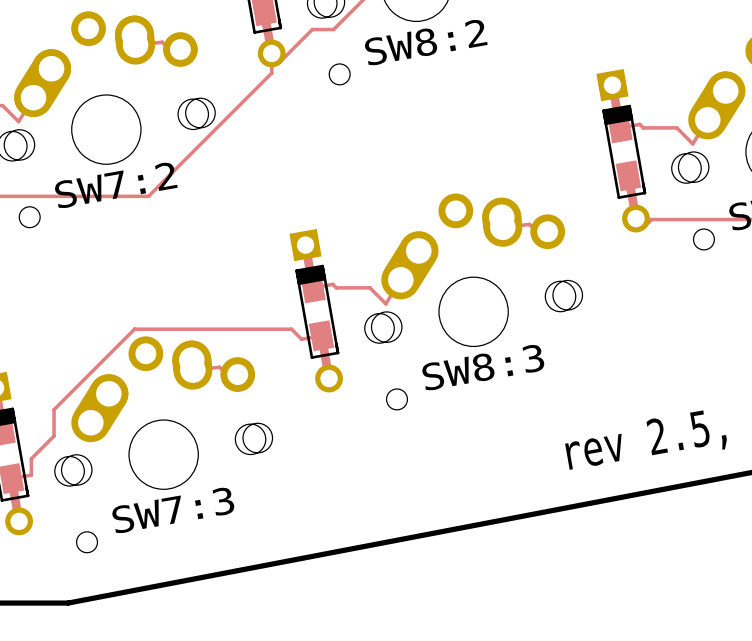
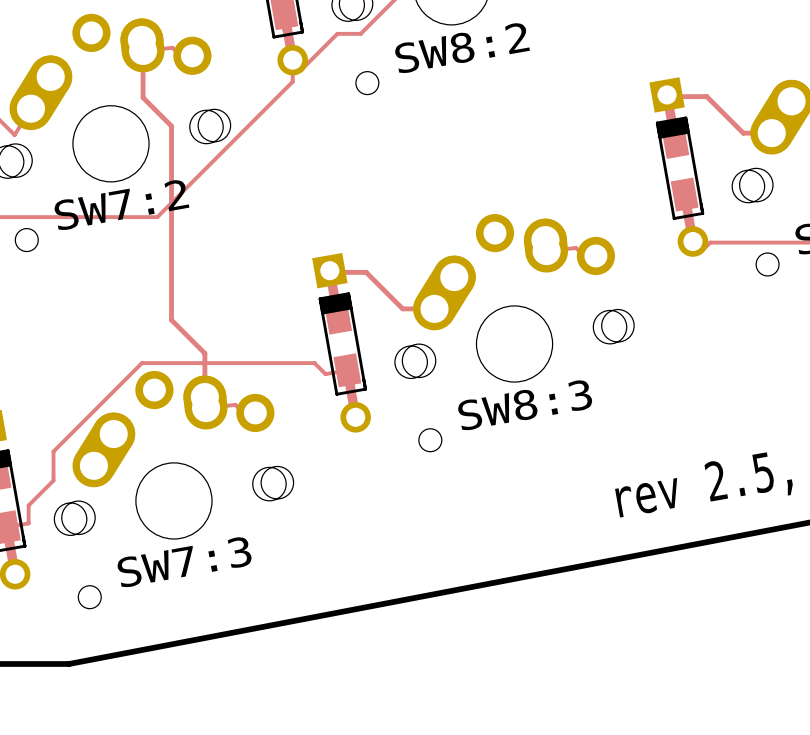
track: none -> (147, 55) (143, 50) (143, 97) (171, 126) (171, 320) (204, 353) (206, 408)
track: (616, 108) (620, 112) (620, 127) (639, 124) (643, 127) (676, 127) (692, 143) (707, 119) -> (680, 96) (706, 96) (743, 133) (771, 133)
track: (309, 268) (313, 272) (313, 287) (332, 284) (336, 287) (369, 287) (385, 303) (400, 279) -> (342, 272) (366, 272) (402, 308) (434, 308)

